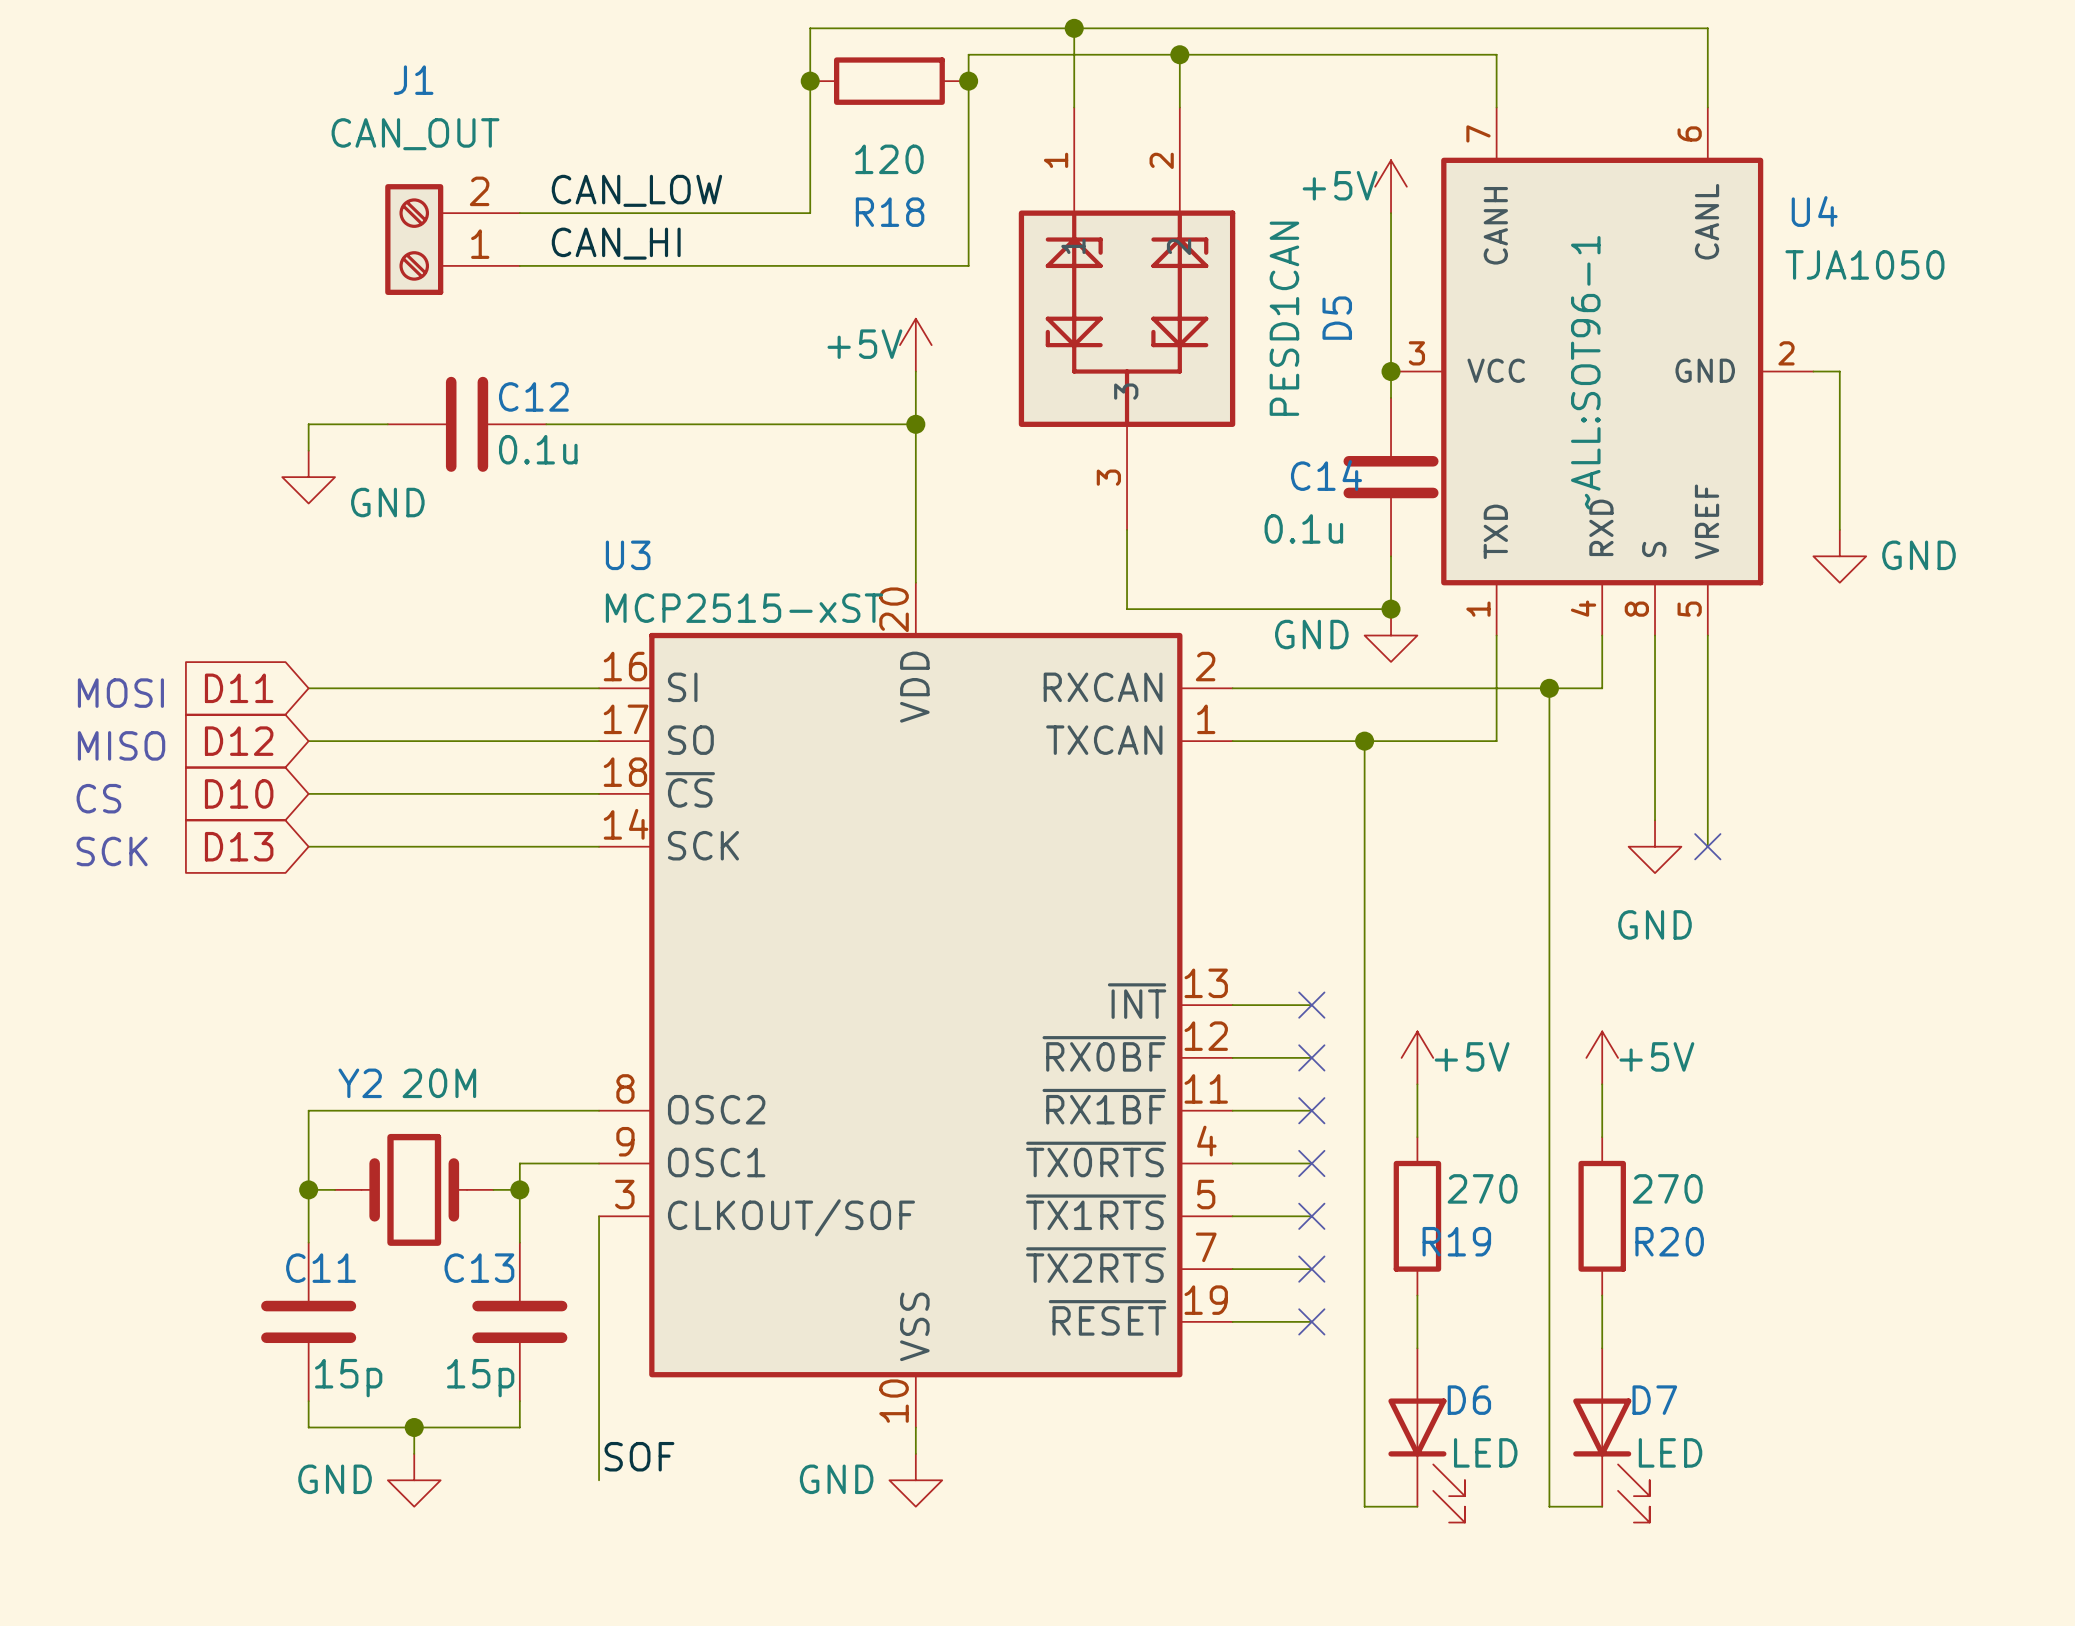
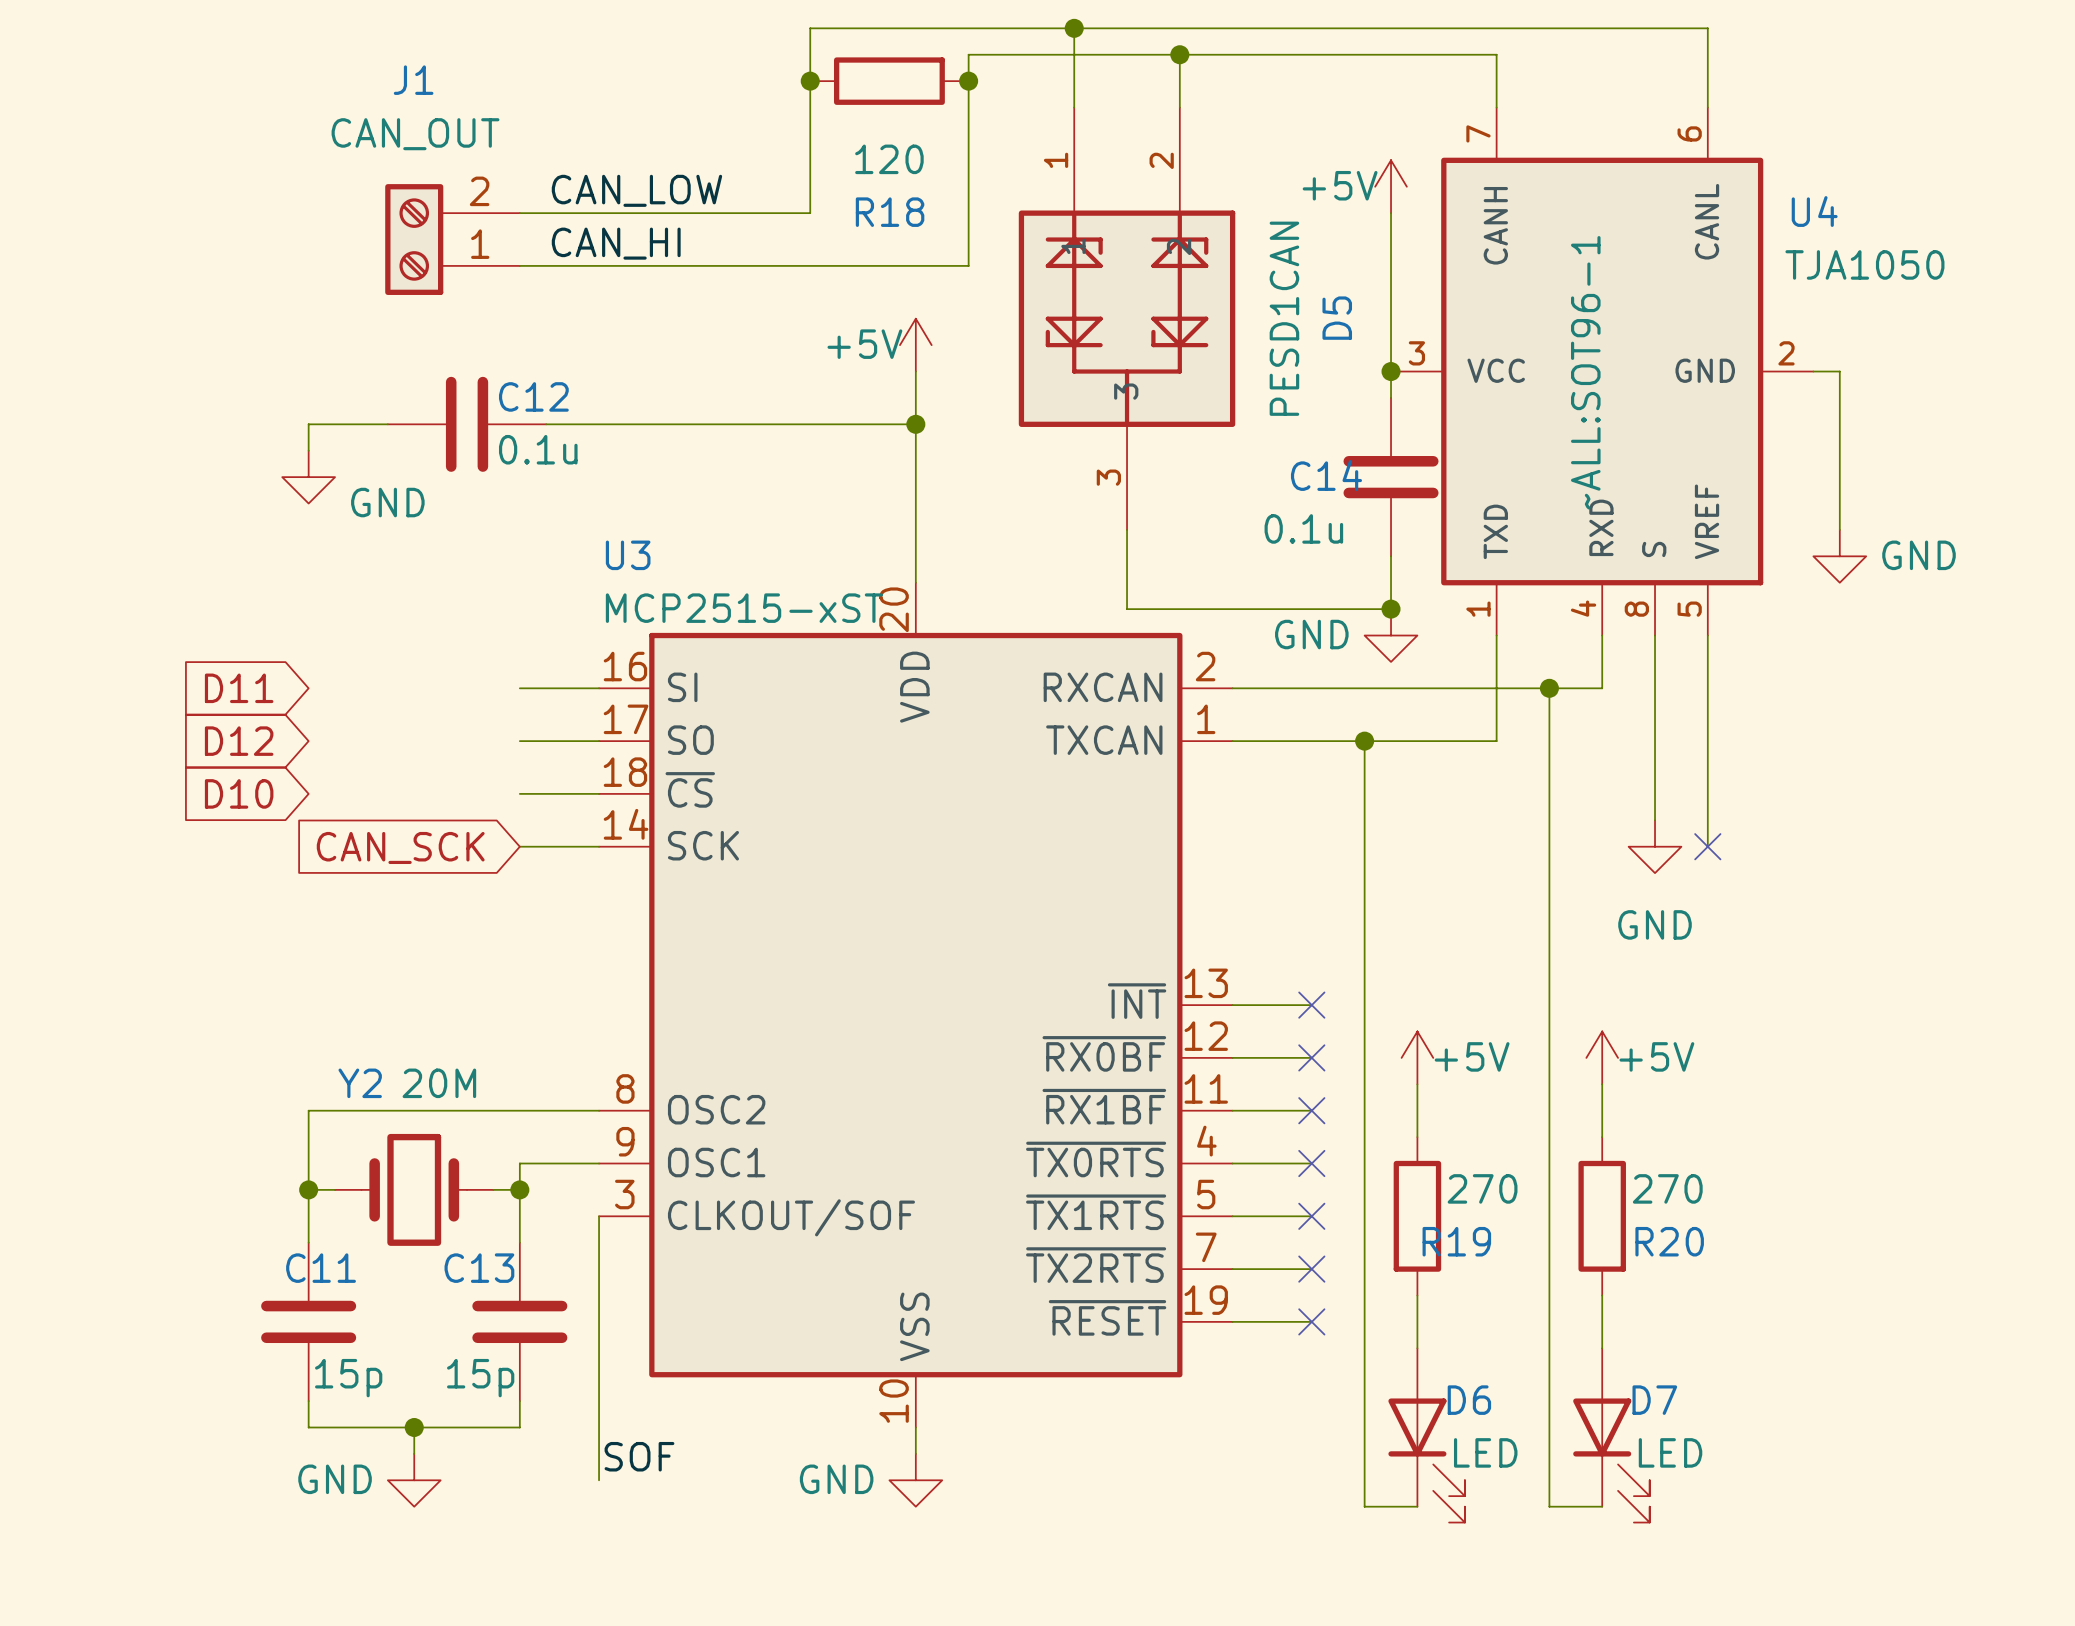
wire: (308, 688) (519, 688) -> none
text: MOSI (120, 693) -> none
wire: (308, 741) (519, 741) -> none
text: MISO (121, 745) -> none
wire: (308, 793) (519, 793) -> none
text: CS (98, 798) -> none
global label: D13 (239, 846) -> none
wire: (308, 846) (519, 846) -> none
global label: none -> CAN_SCK (400, 847)
text: SCK (112, 851) -> none

